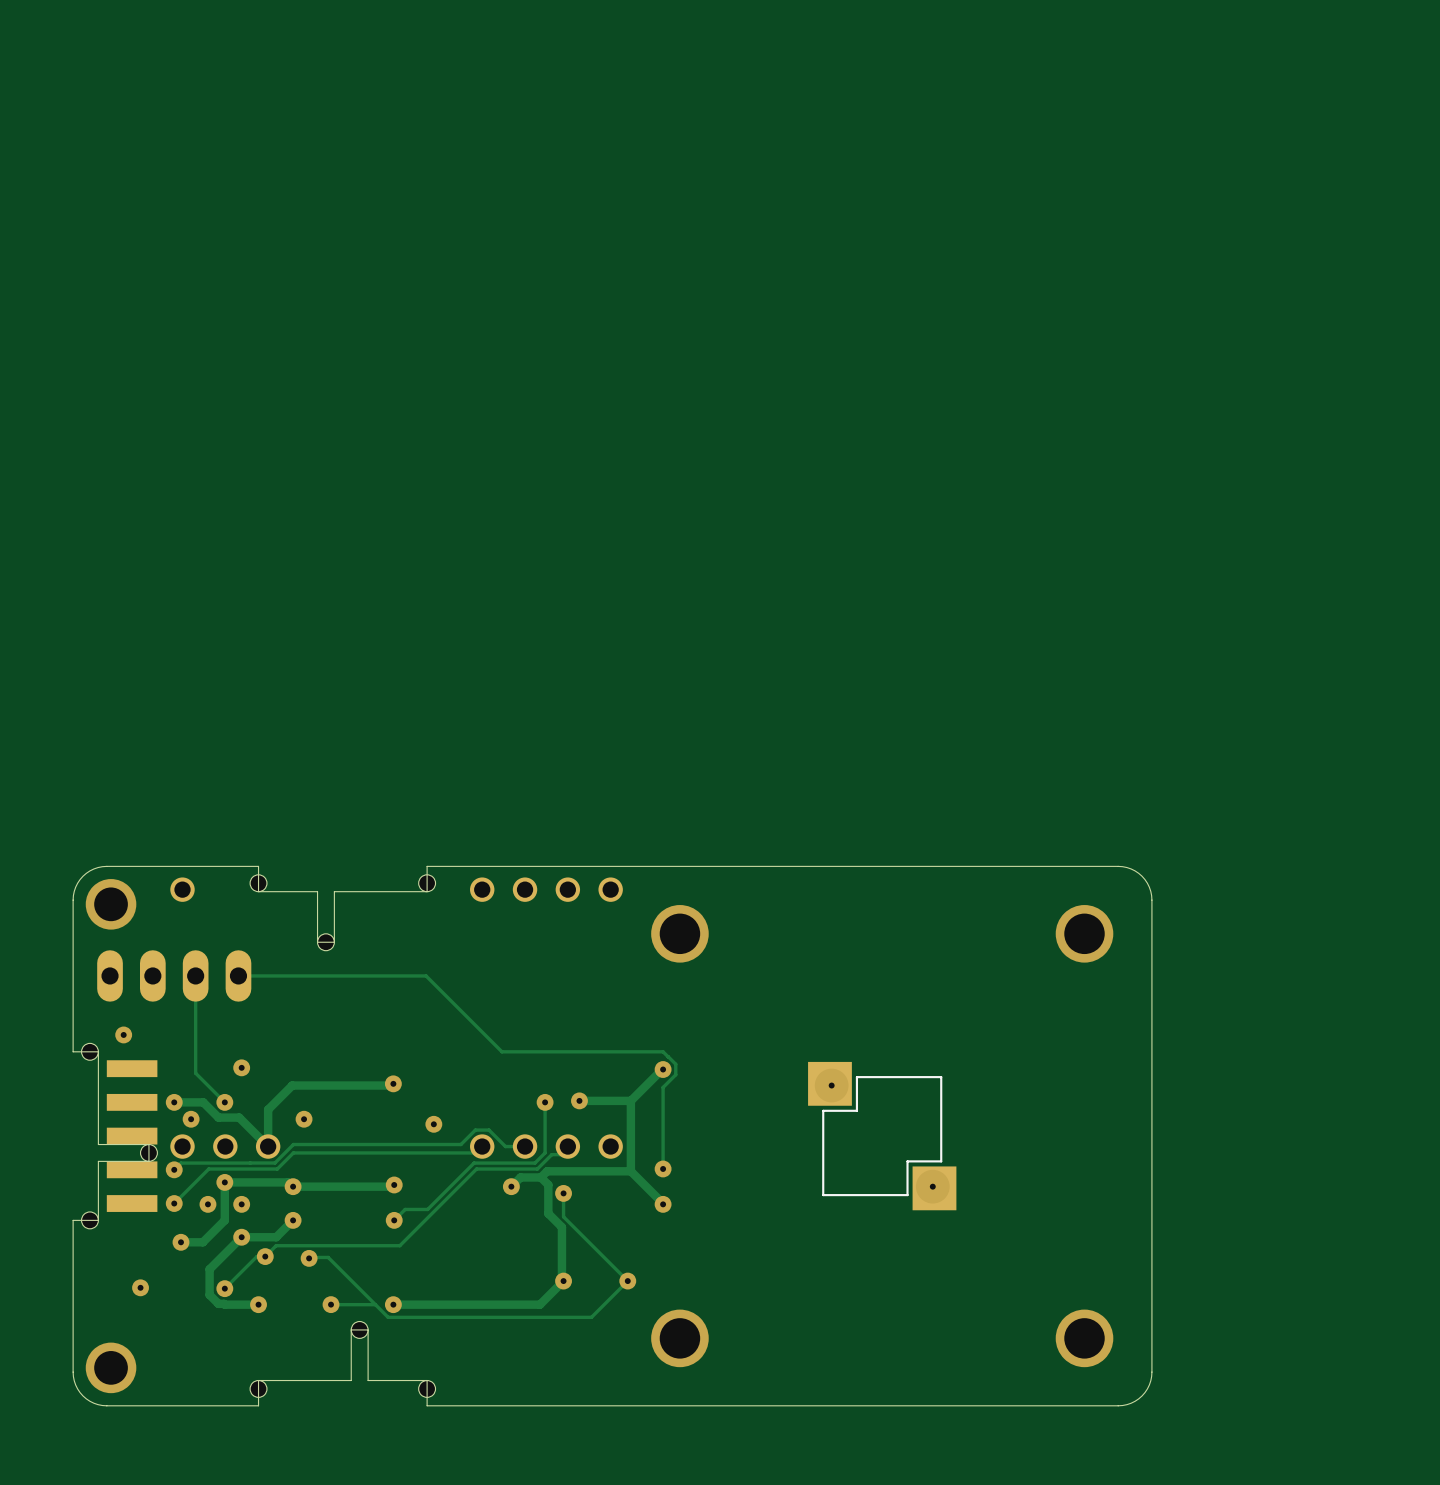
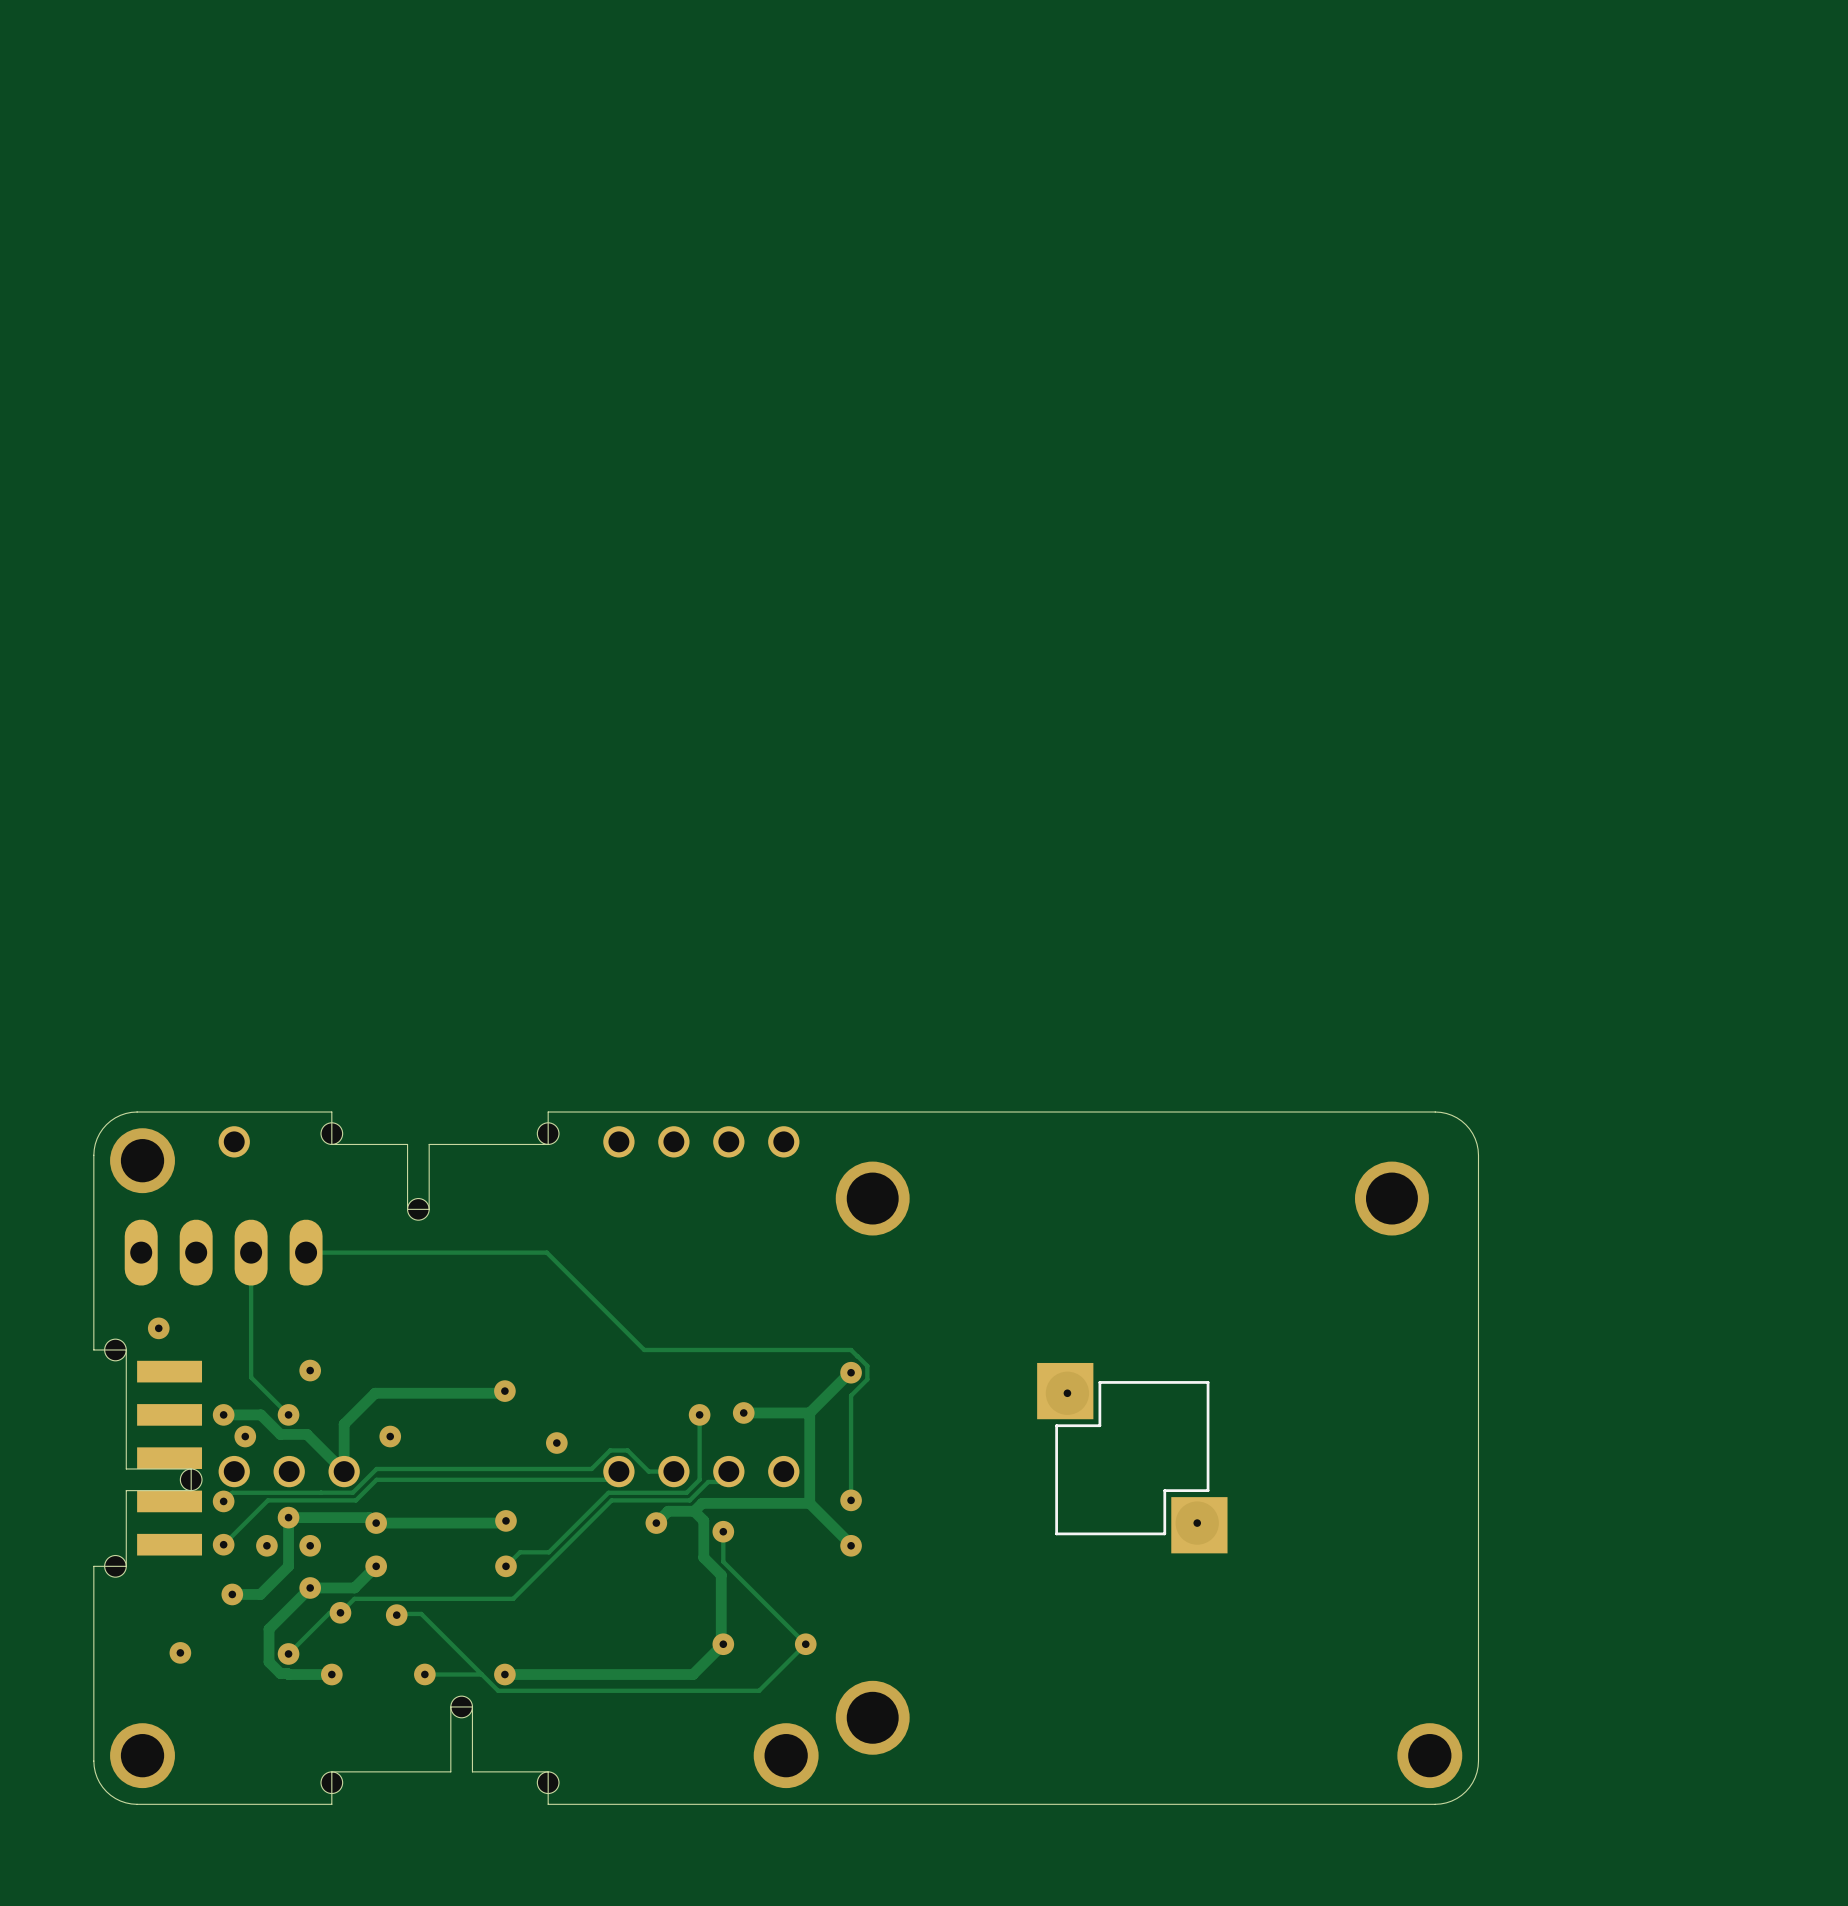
via: (1084, 1338) -> none
via: none -> (786, 1755)
via: none -> (1429, 1755)

